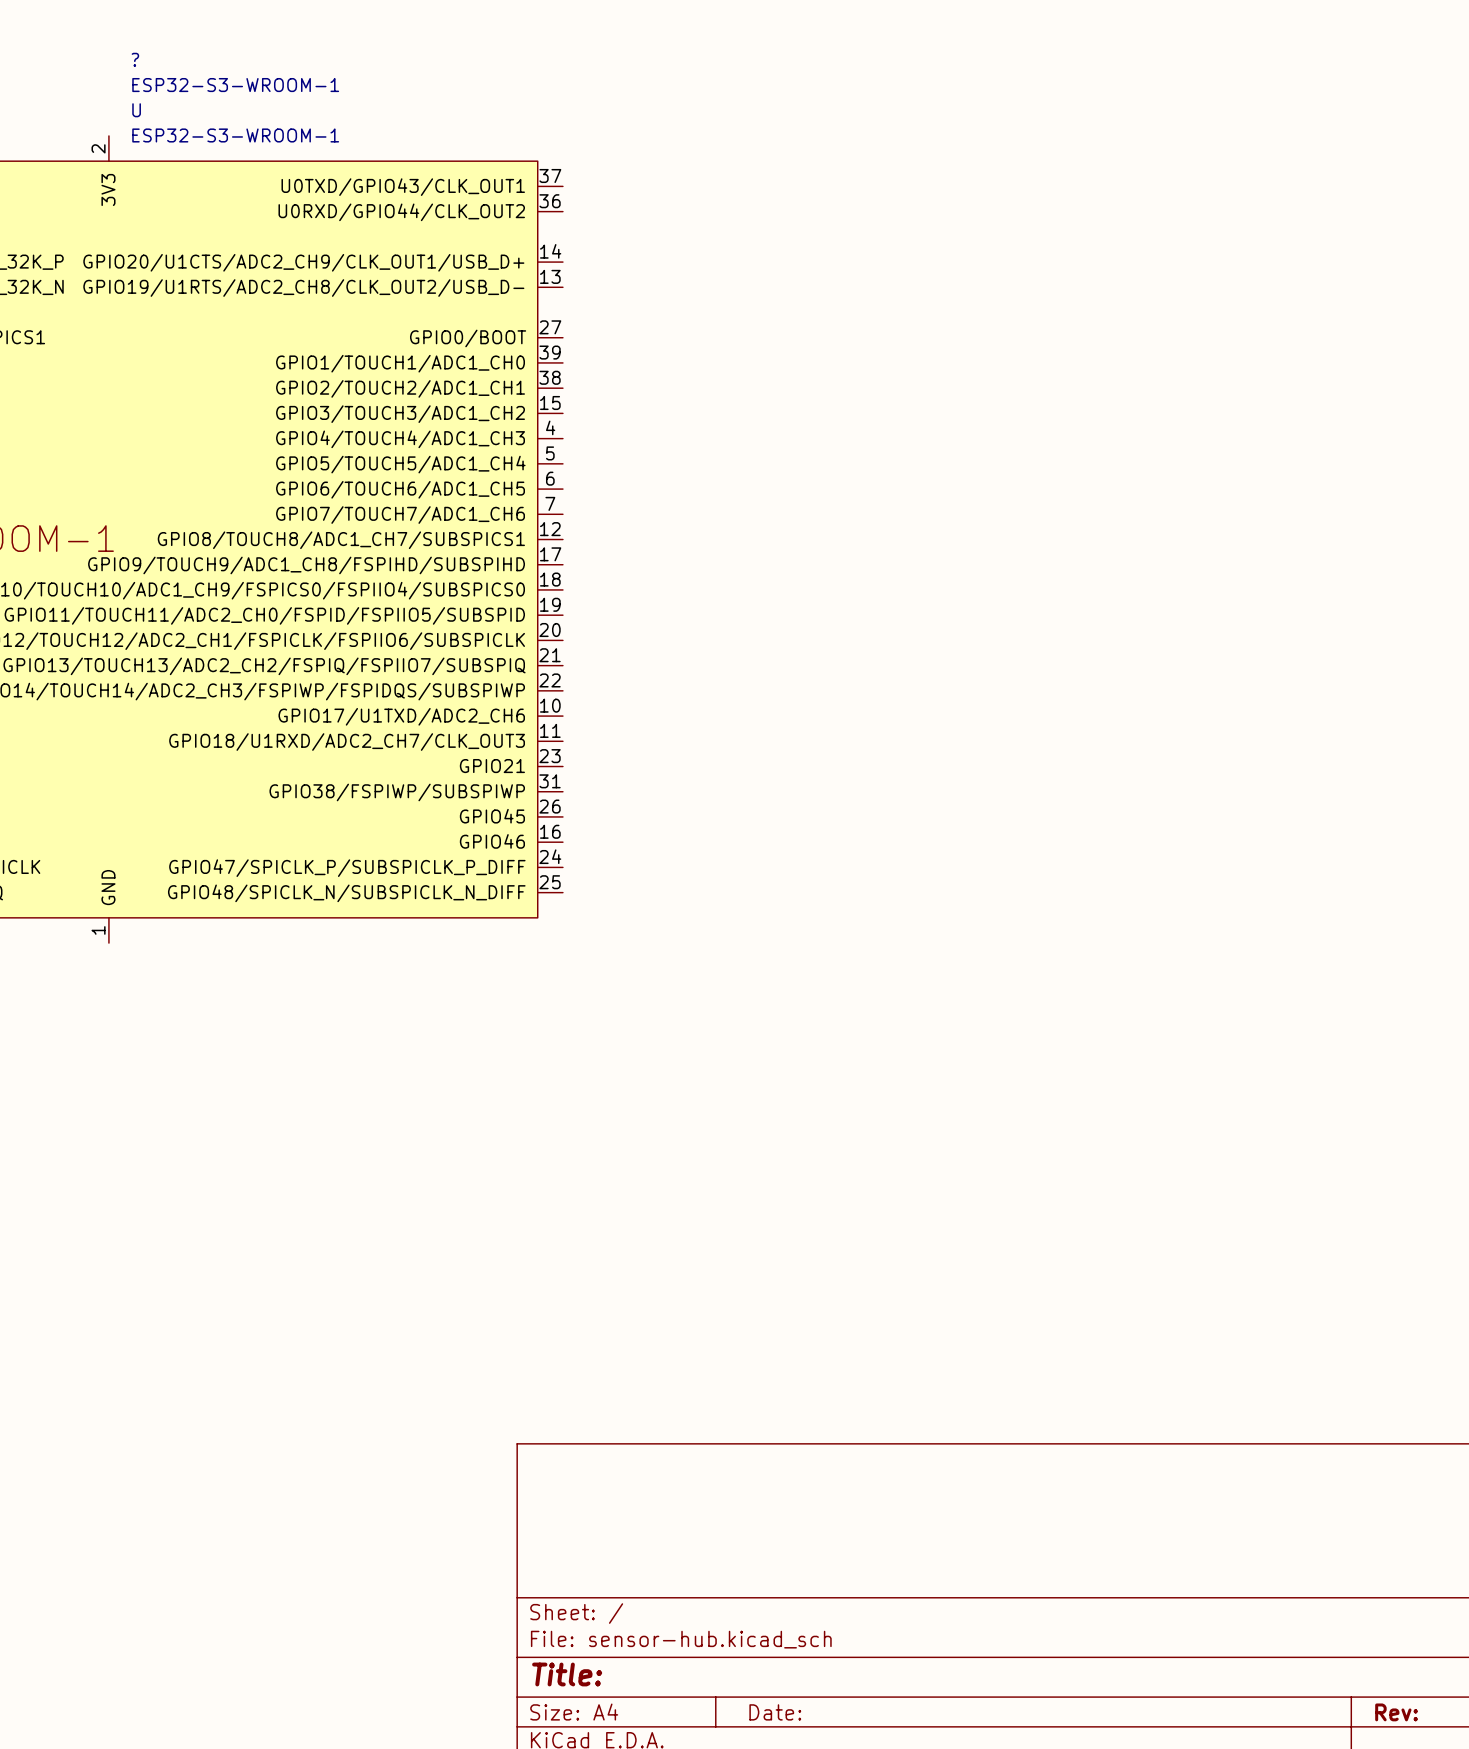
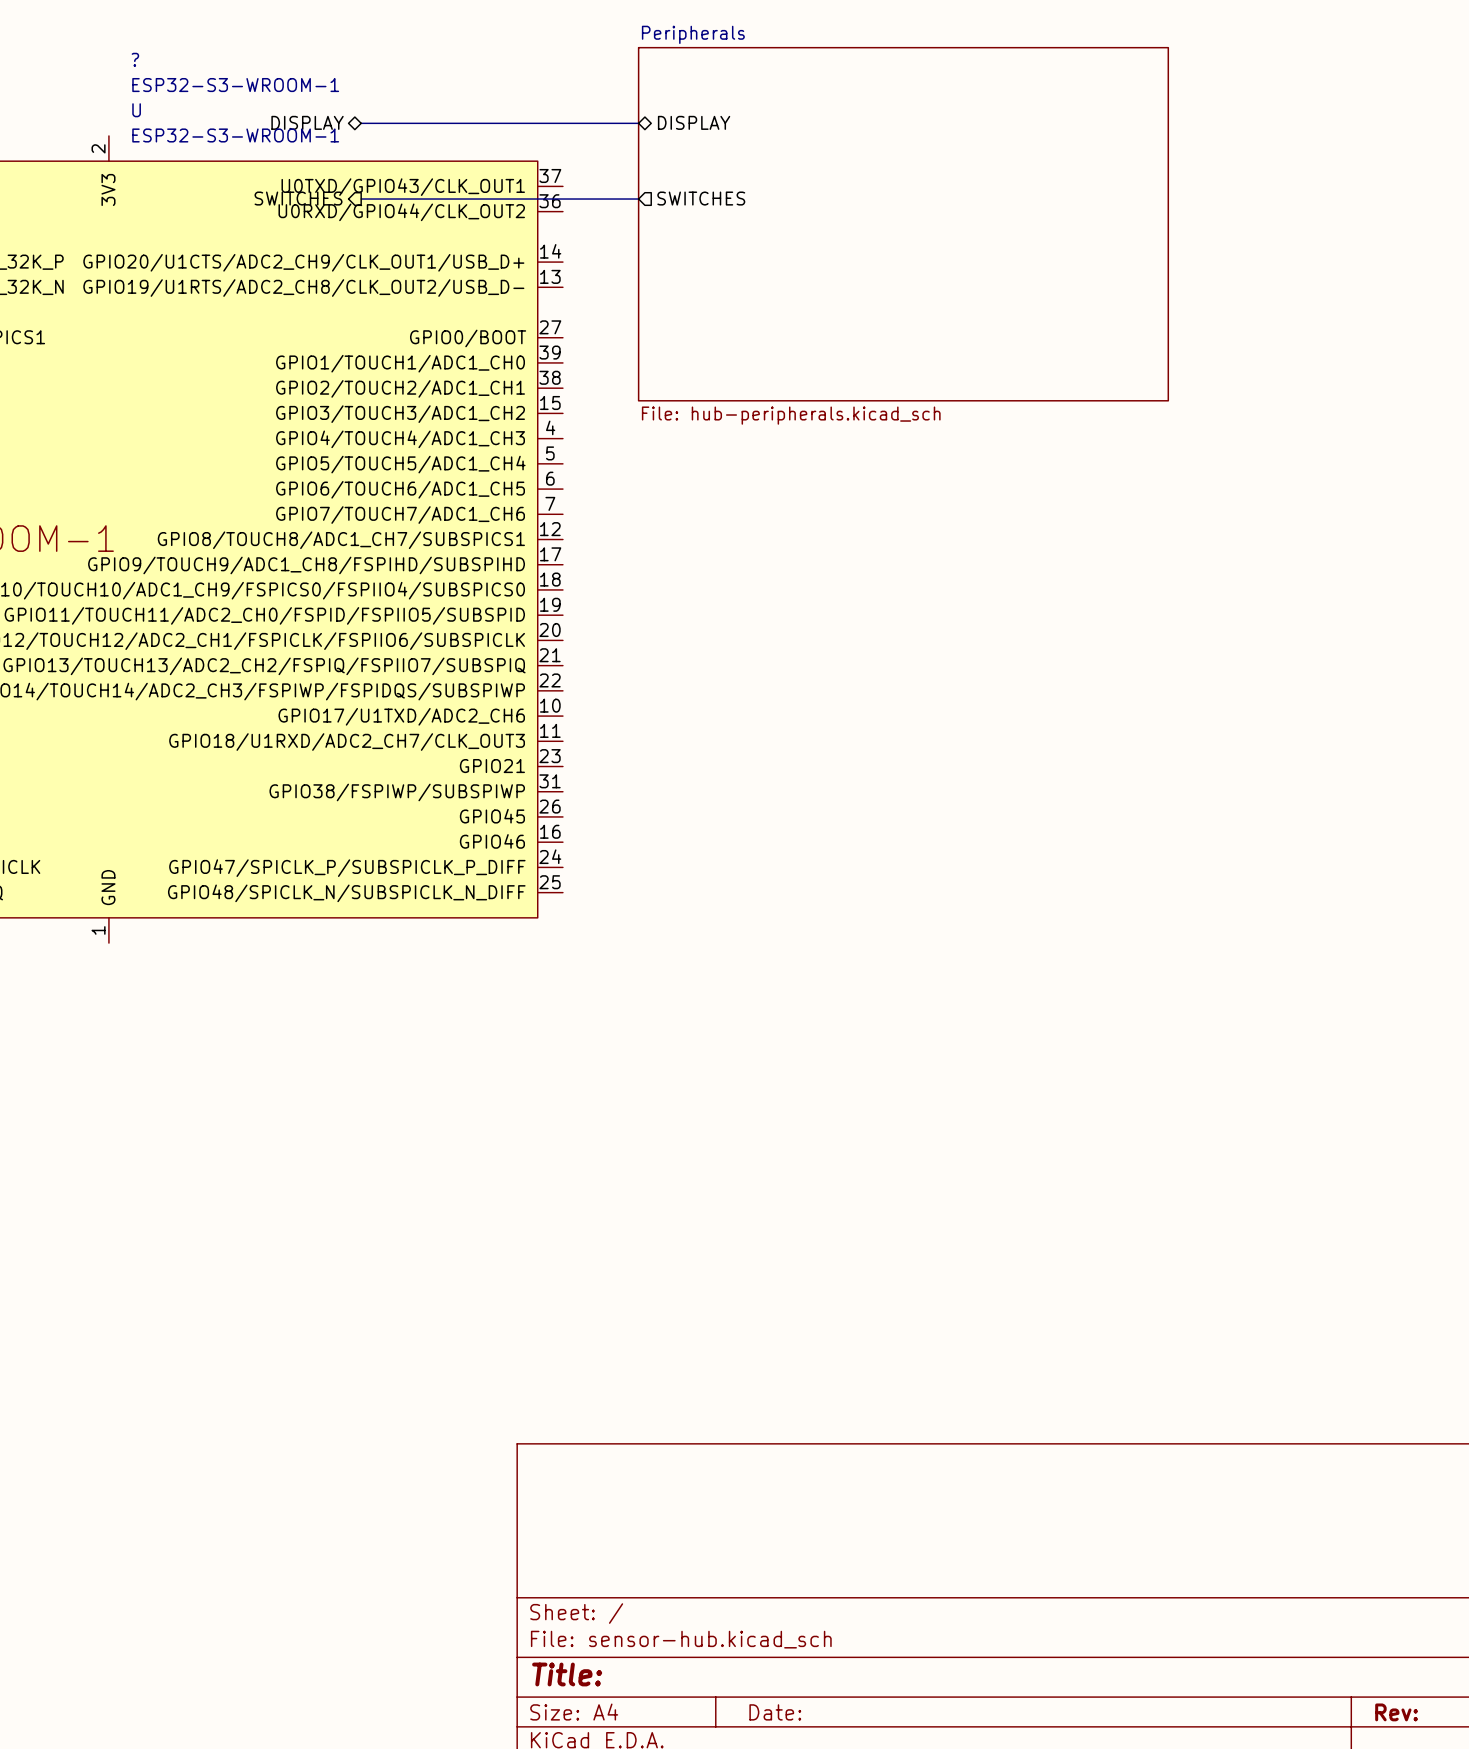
sheet pin: none -> DISPLAY (307, 122)
sheet pin: none -> DISPLAY (694, 122)
bus: none -> (361, 123) (638, 123)
sheet pin: none -> SWITCHES (298, 198)
sheet pin: none -> SWITCHES (701, 198)
bus: none -> (361, 199) (638, 199)
sheet Peripherals: none -> File: hub-peripherals.kicad_sch (903, 224)

